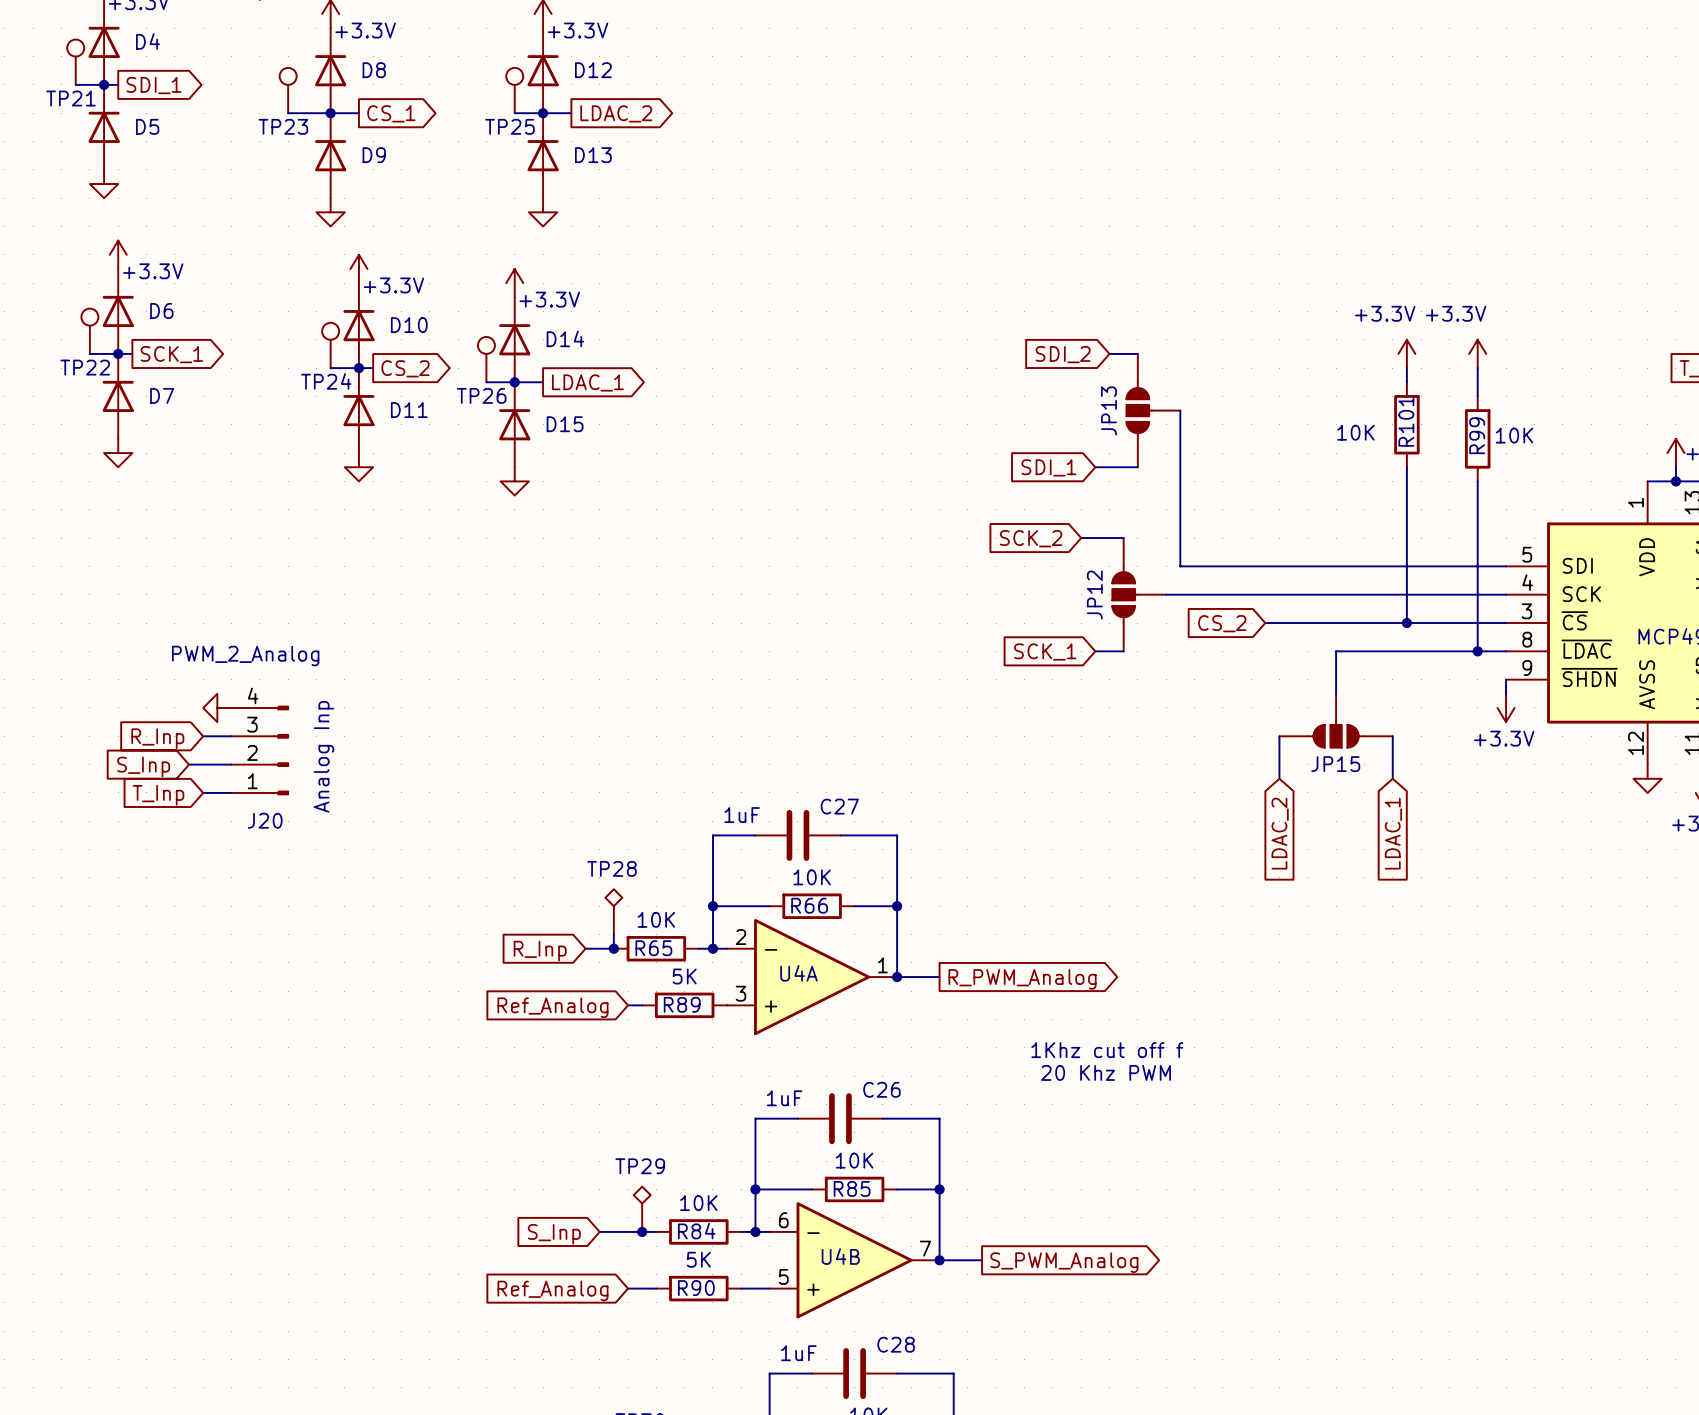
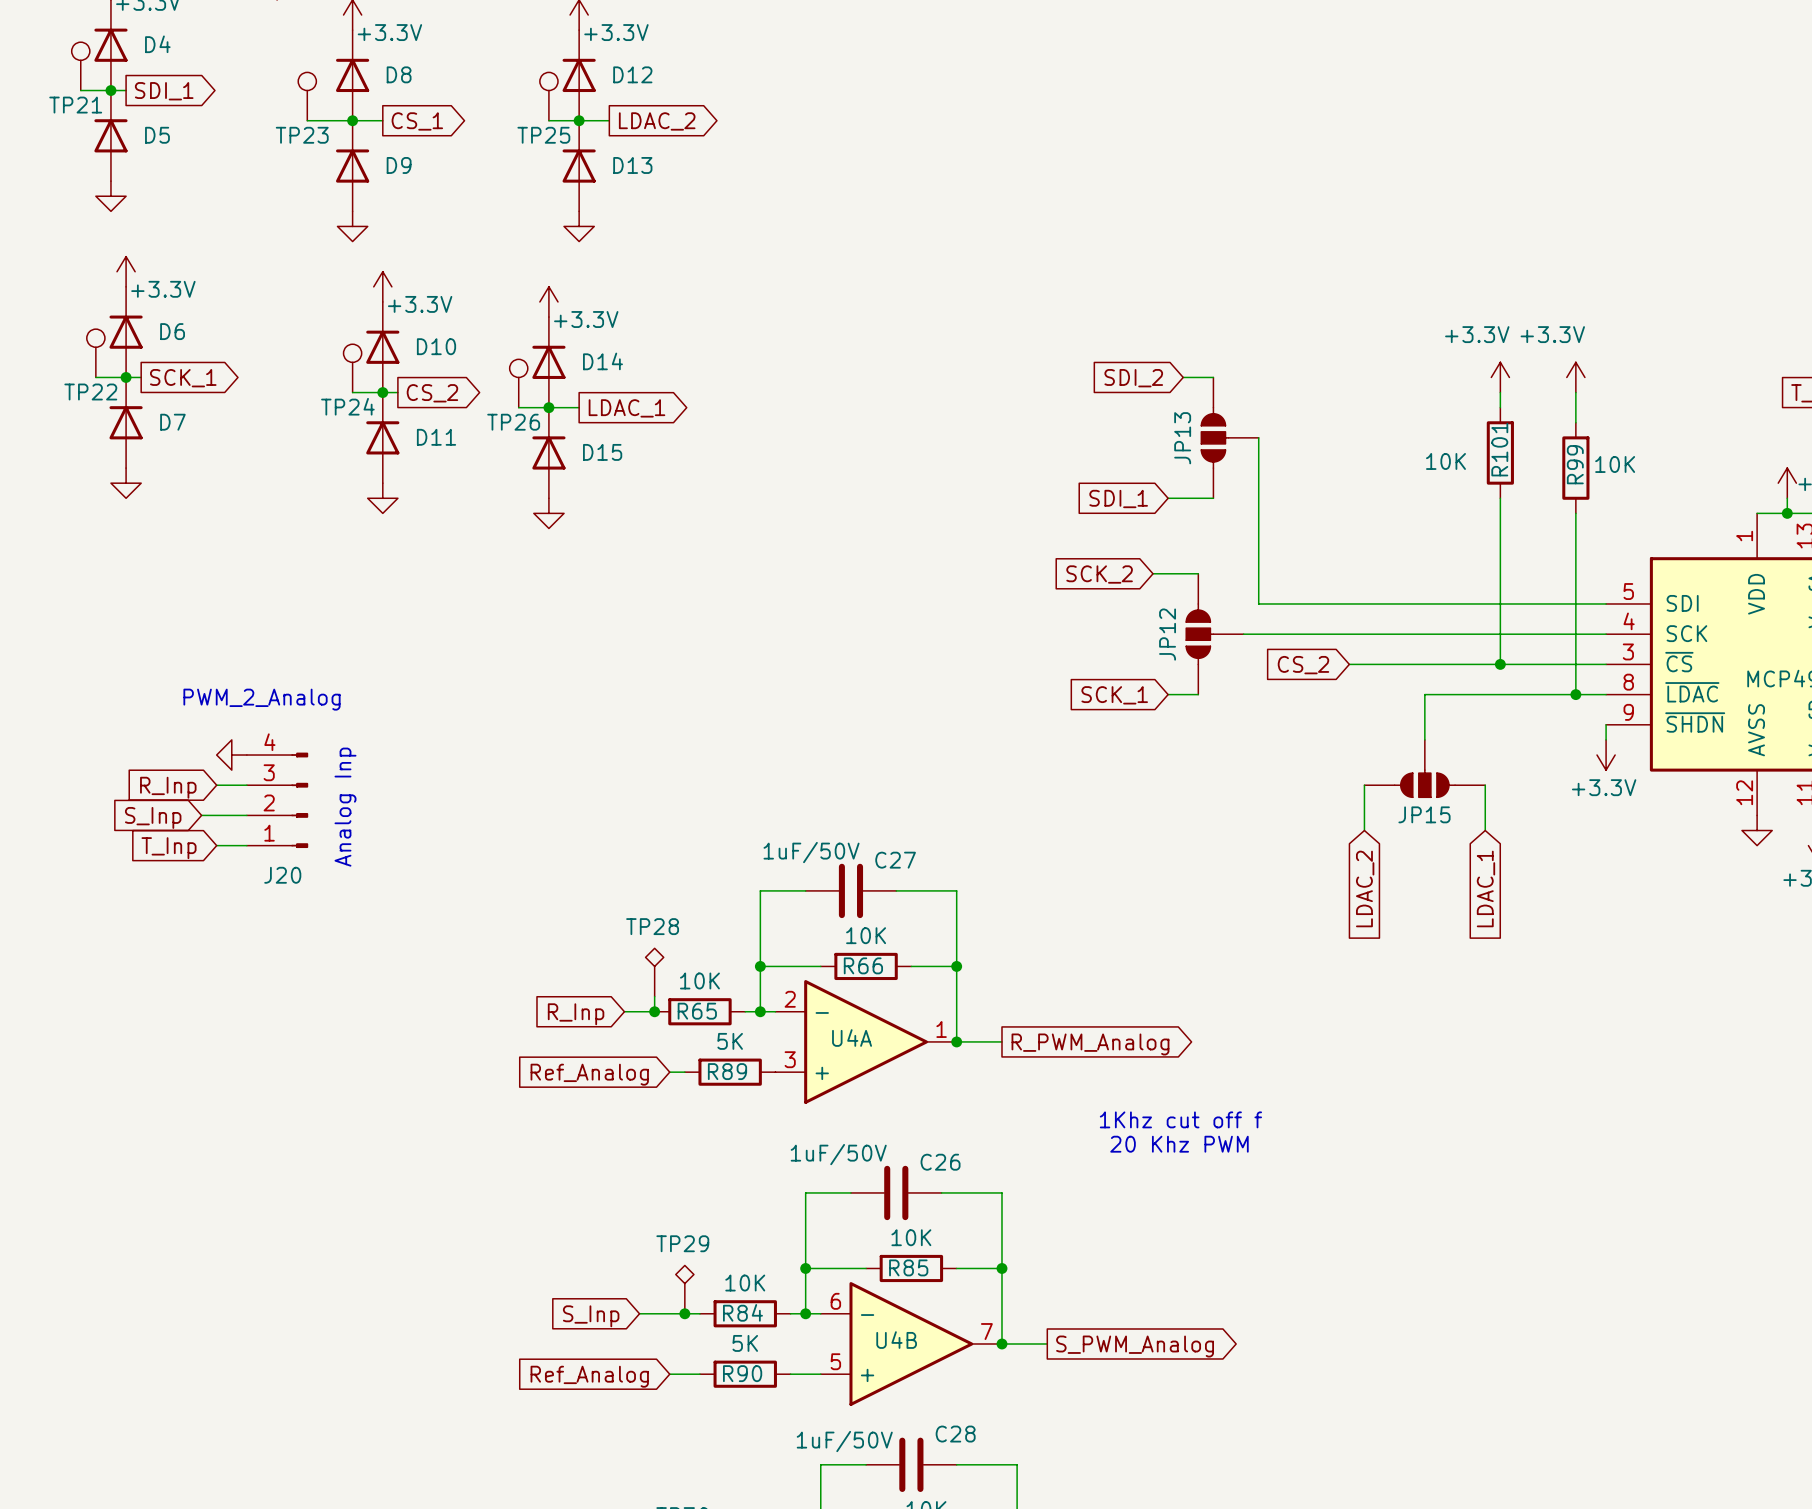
C27 value: 1uF (742, 815) -> 1uF/50V (811, 852)
C26 value: 1uF (784, 1098) -> 1uF/50V (838, 1154)
C28 value: 1uF (798, 1353) -> 1uF/50V (844, 1441)

